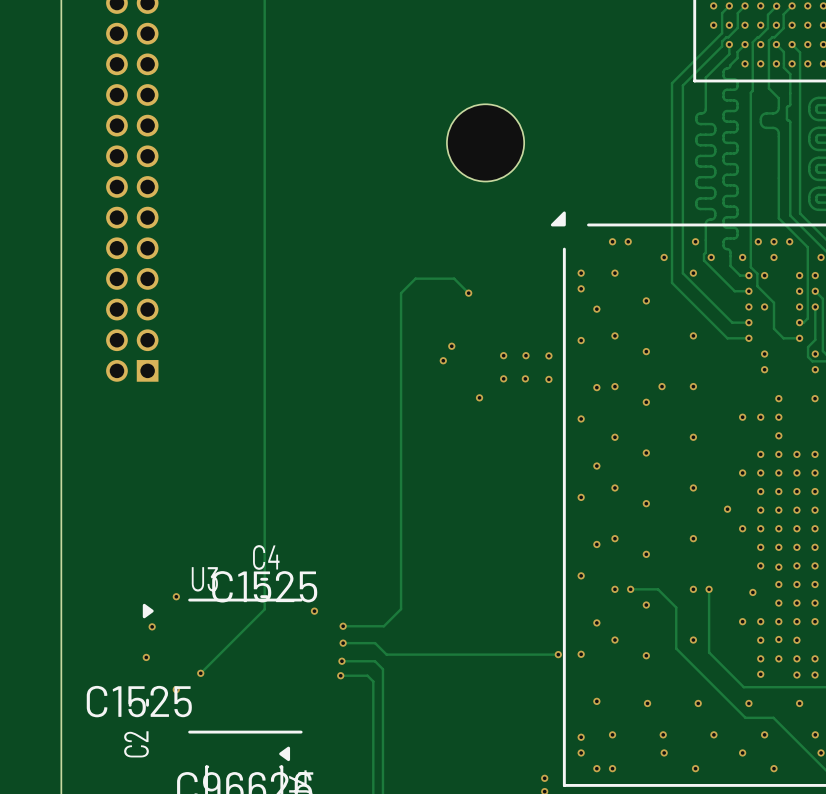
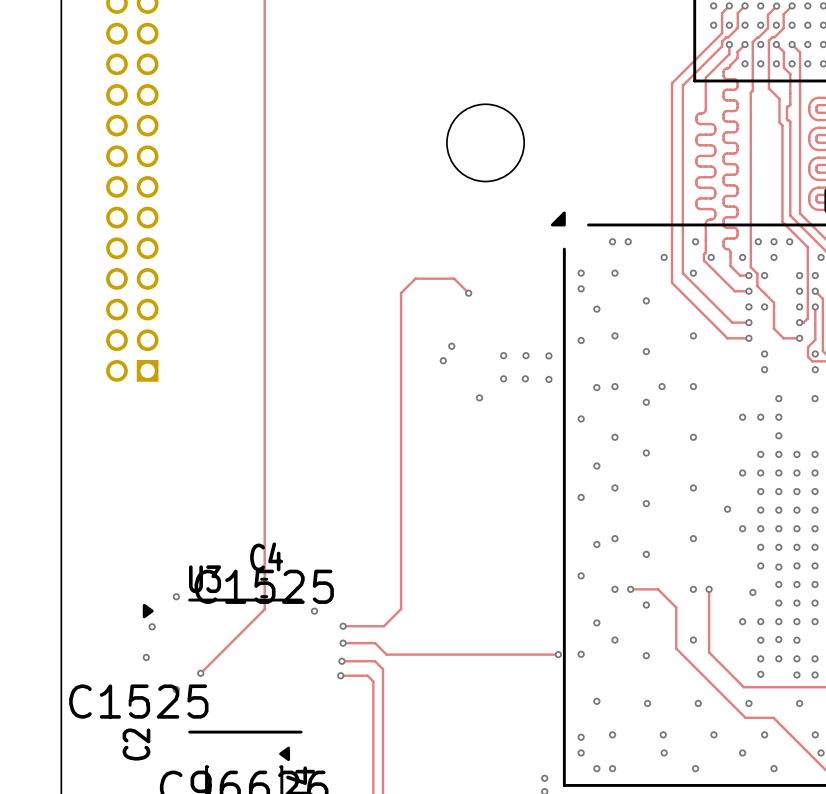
track: (778, 98) (777, 111) (763, 114) (760, 122) (763, 127) (774, 128) (778, 132) (778, 218) (782, 221) -> (778, 98) (779, 122) (782, 125) (782, 221)

